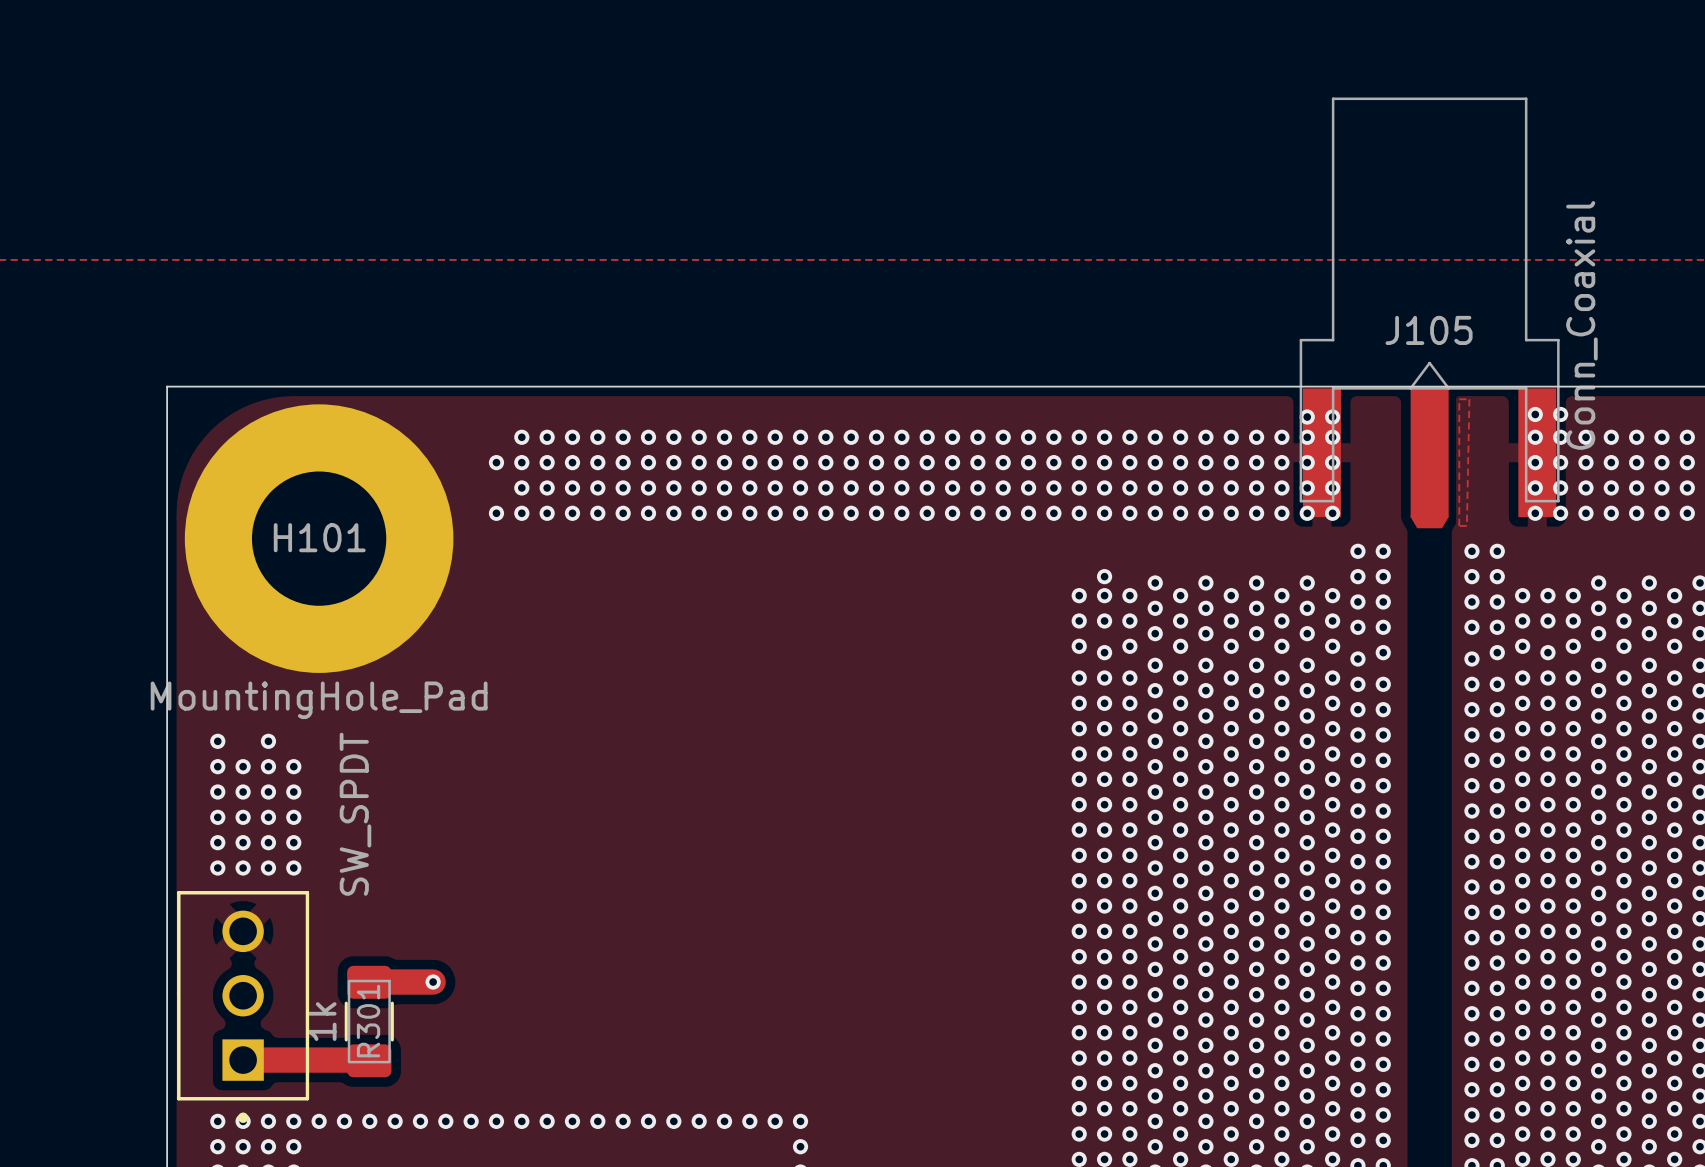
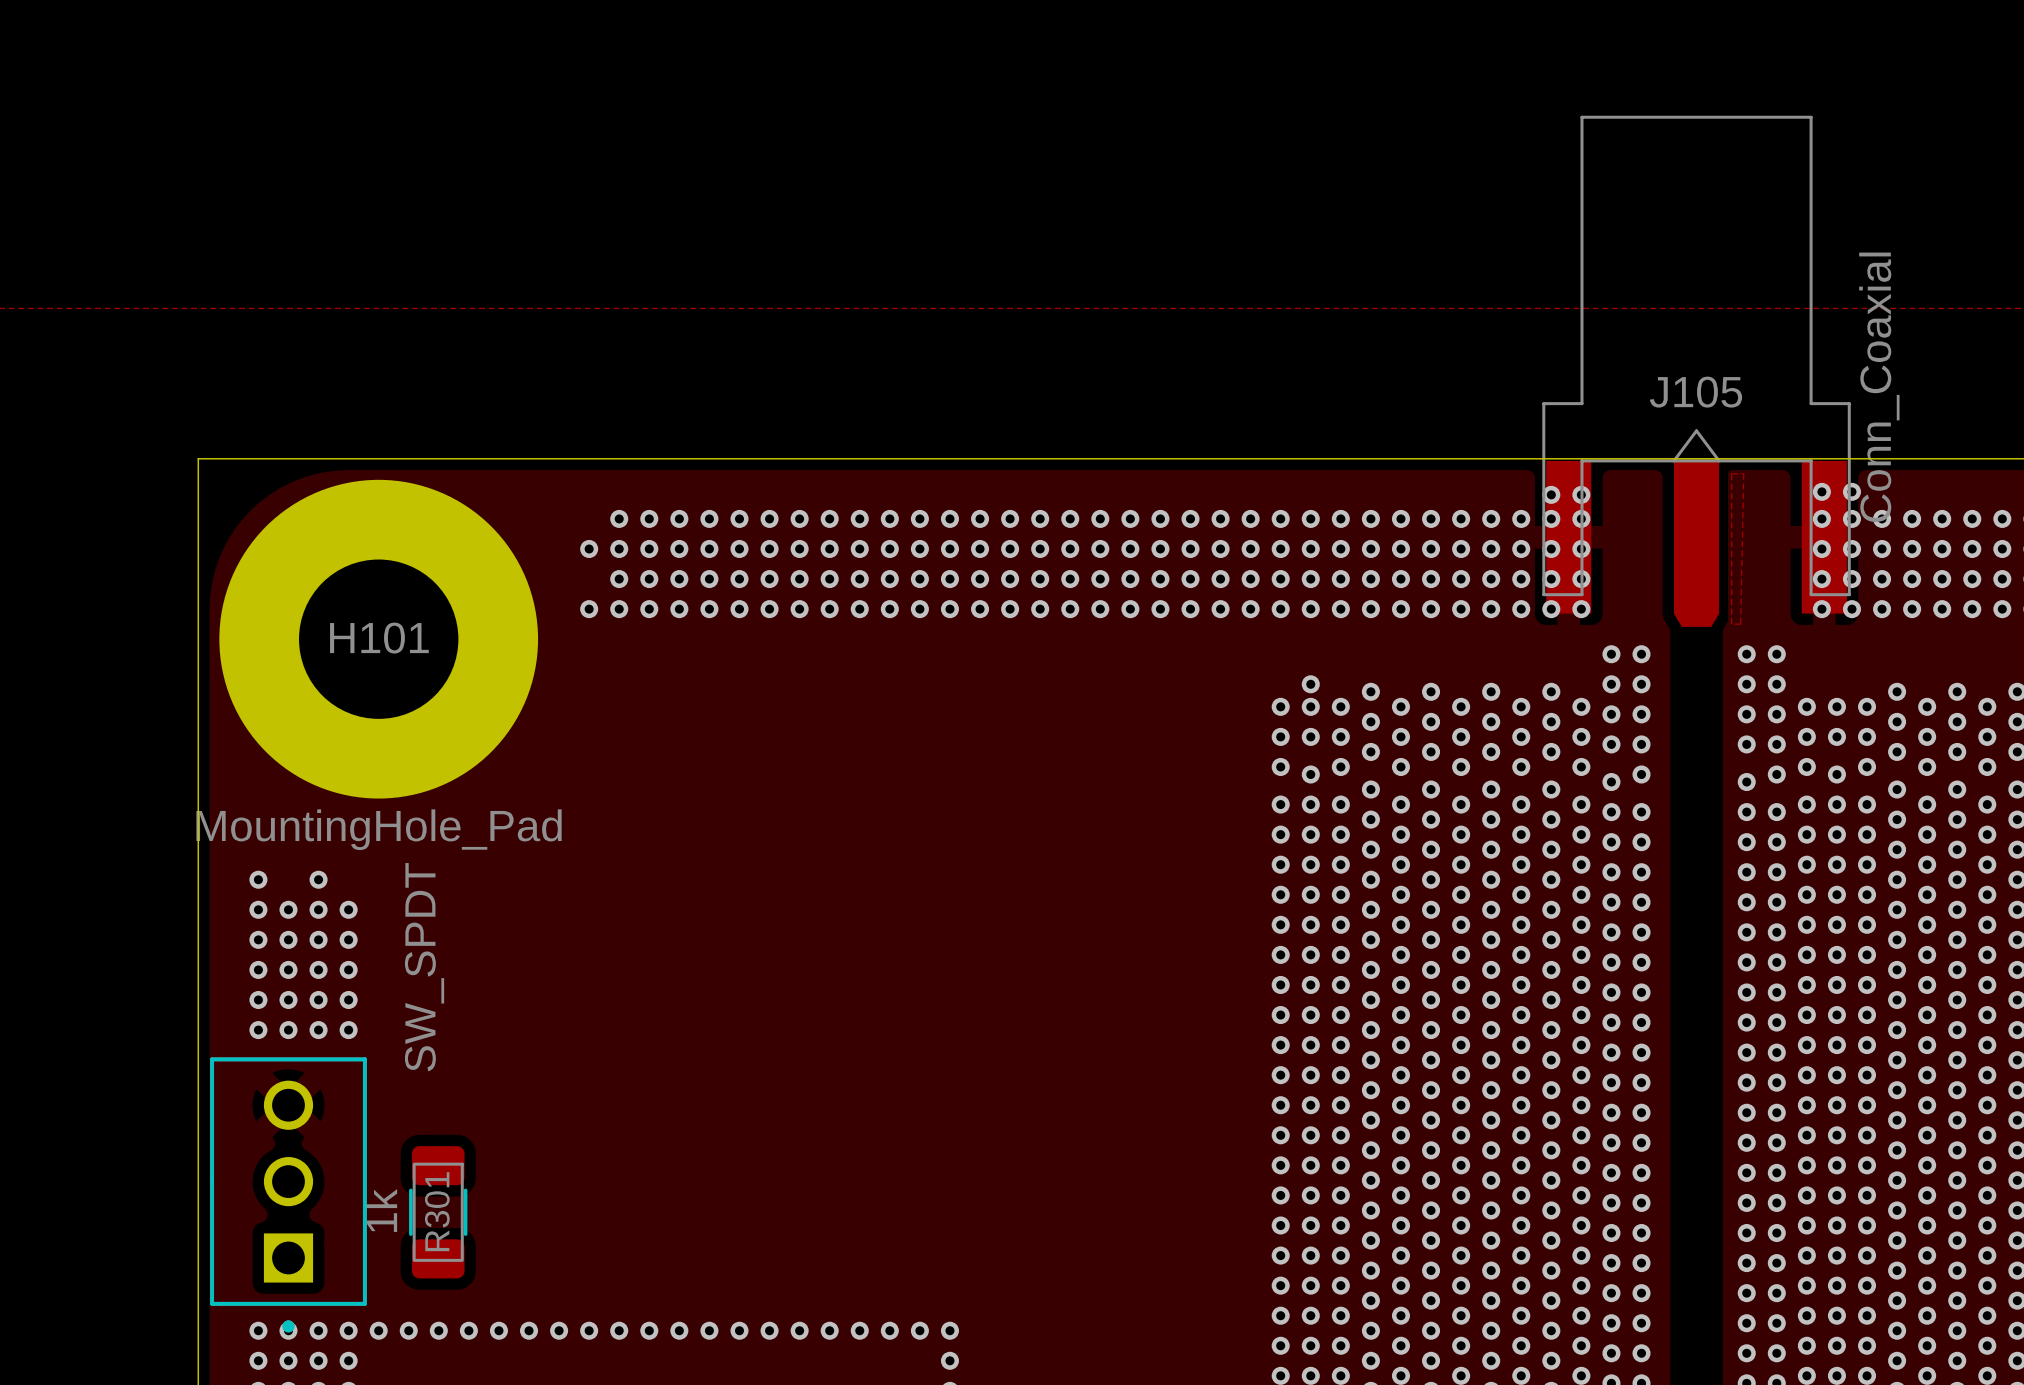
track: (369, 982) (433, 982) -> none
via: (433, 982) -> none
track: (243, 1060) (369, 1060) -> none

